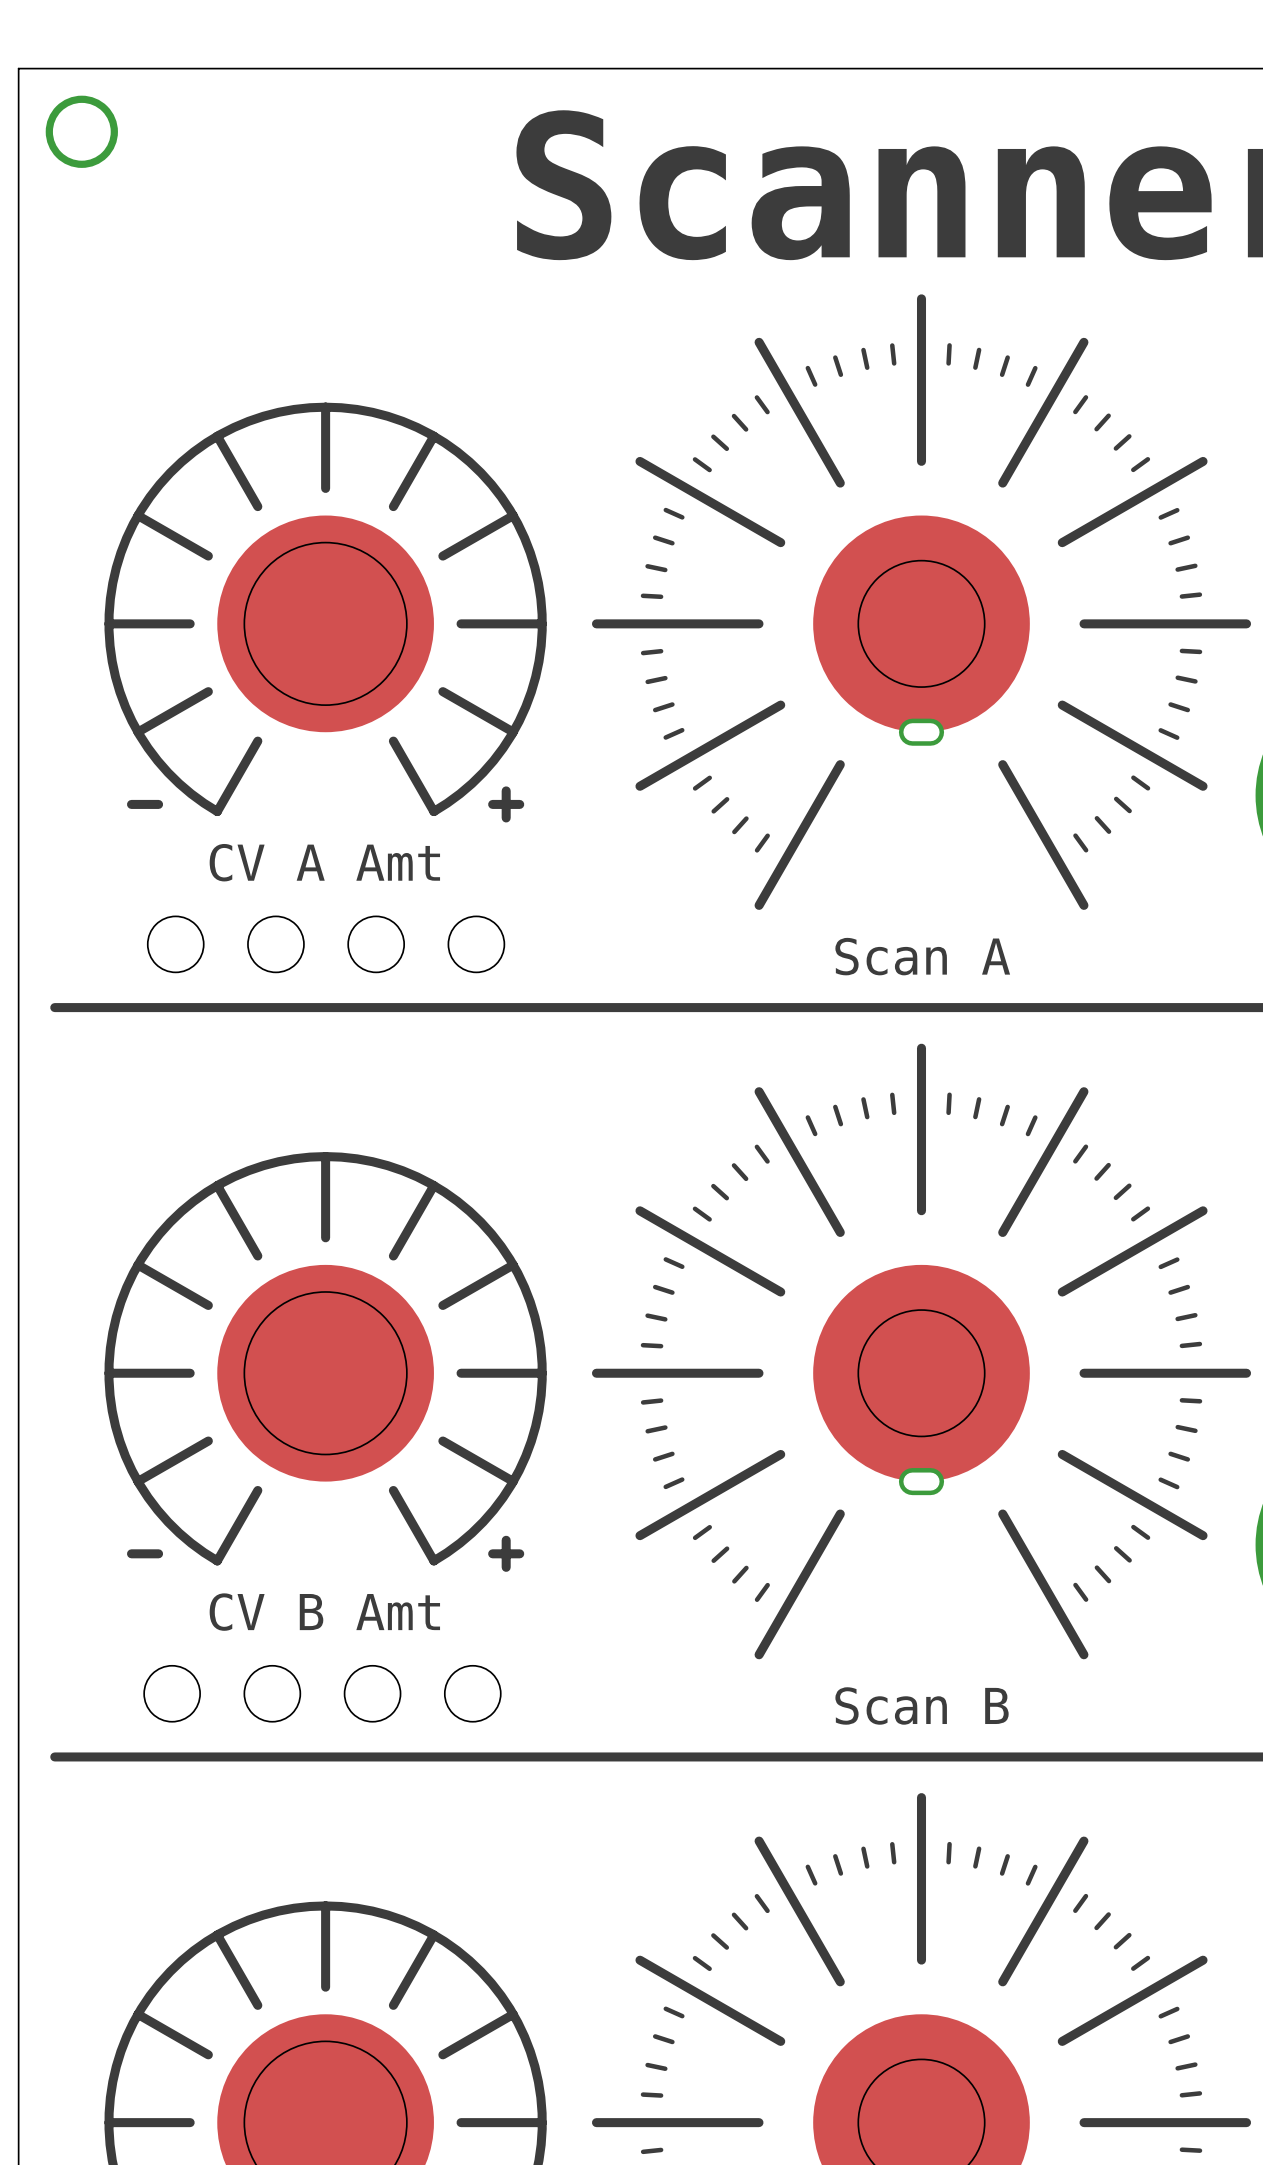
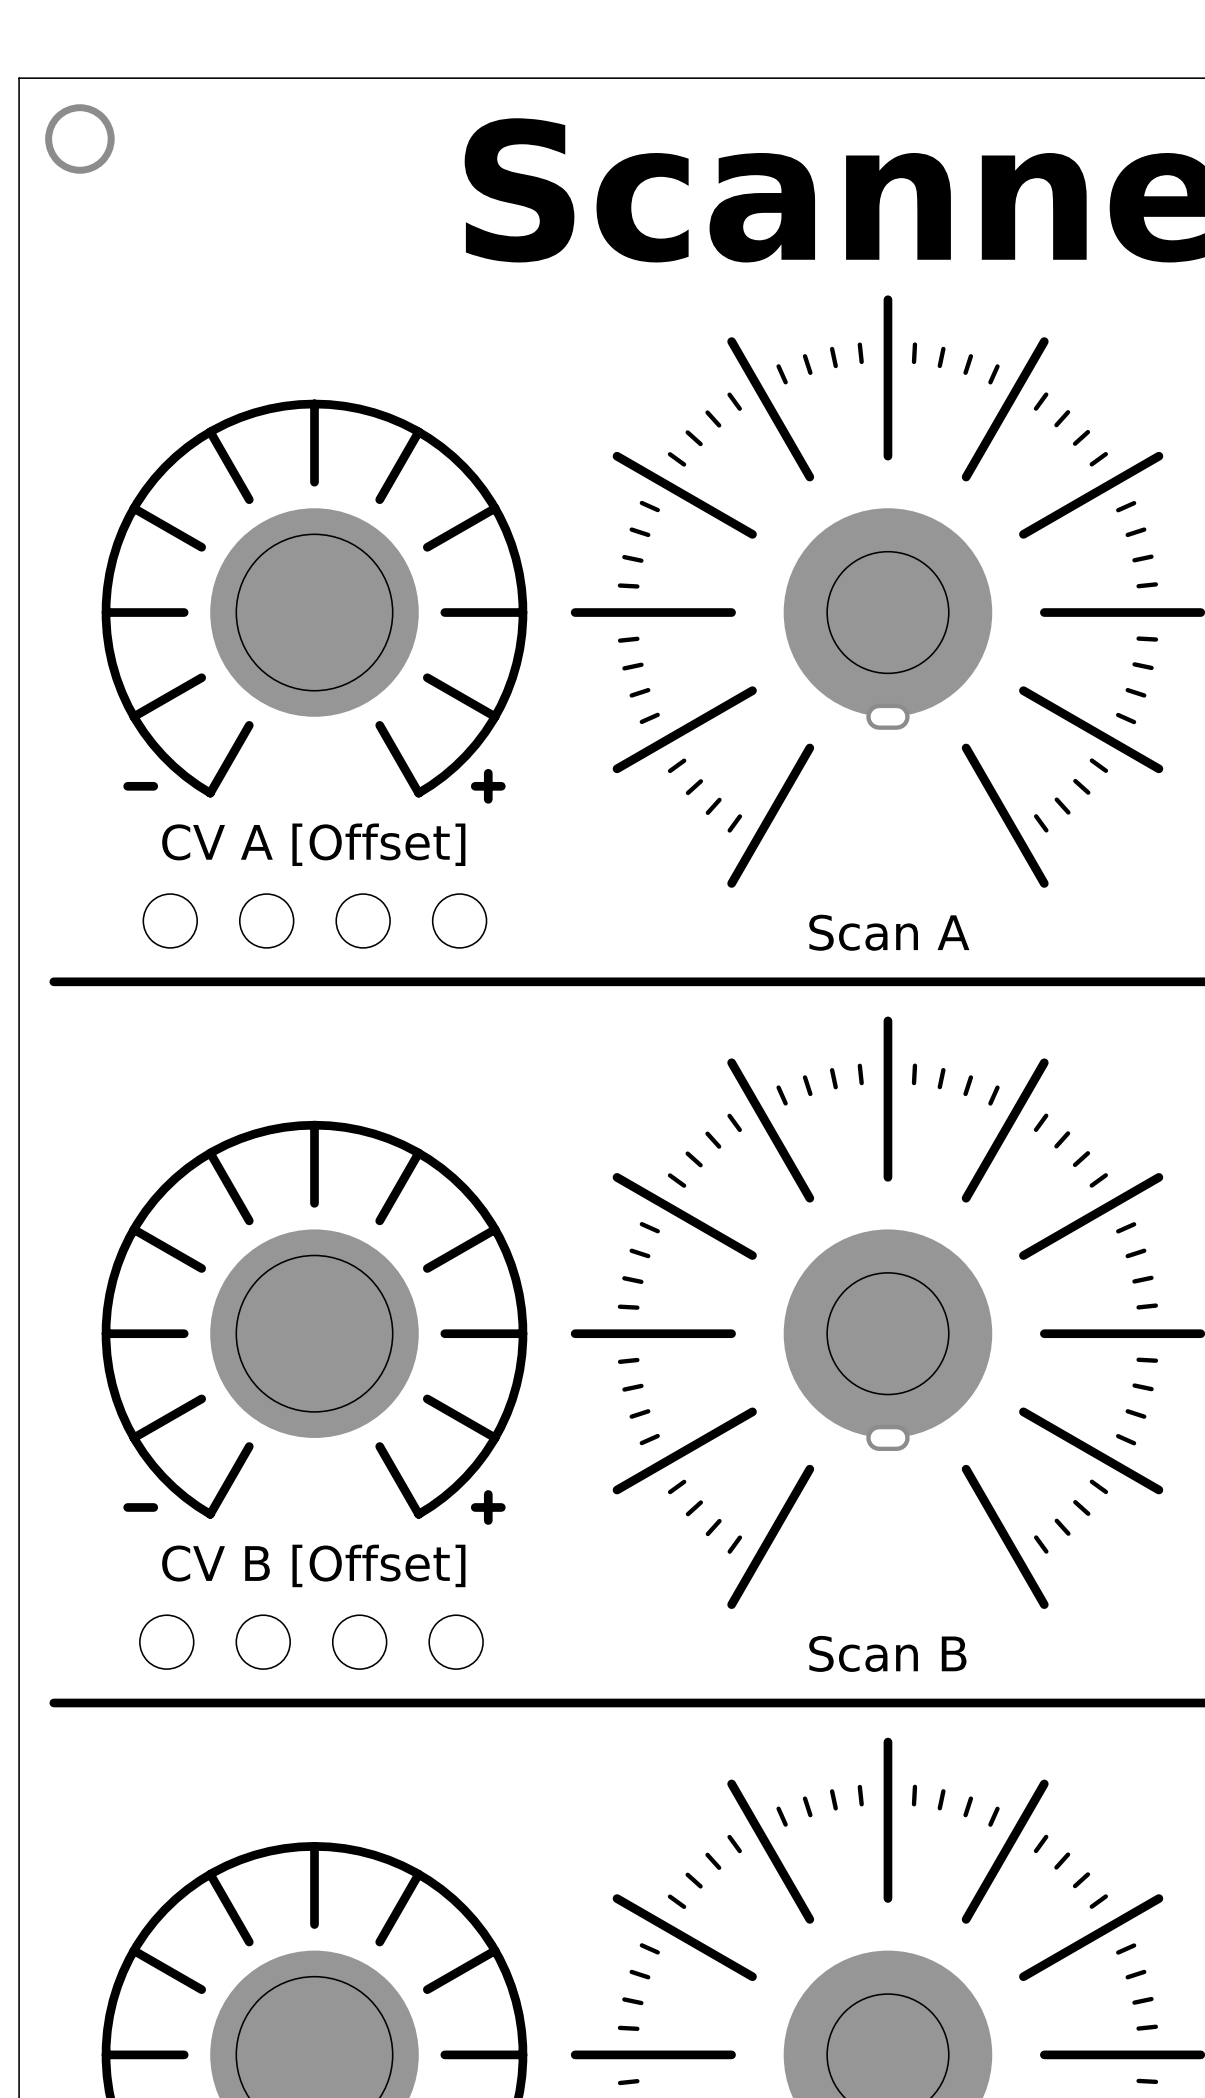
part value: CV A Amt (324, 862) -> CV A [Offset] (313, 844)
part value: CV B Amt (324, 1612) -> CV B [Offset] (313, 1565)

